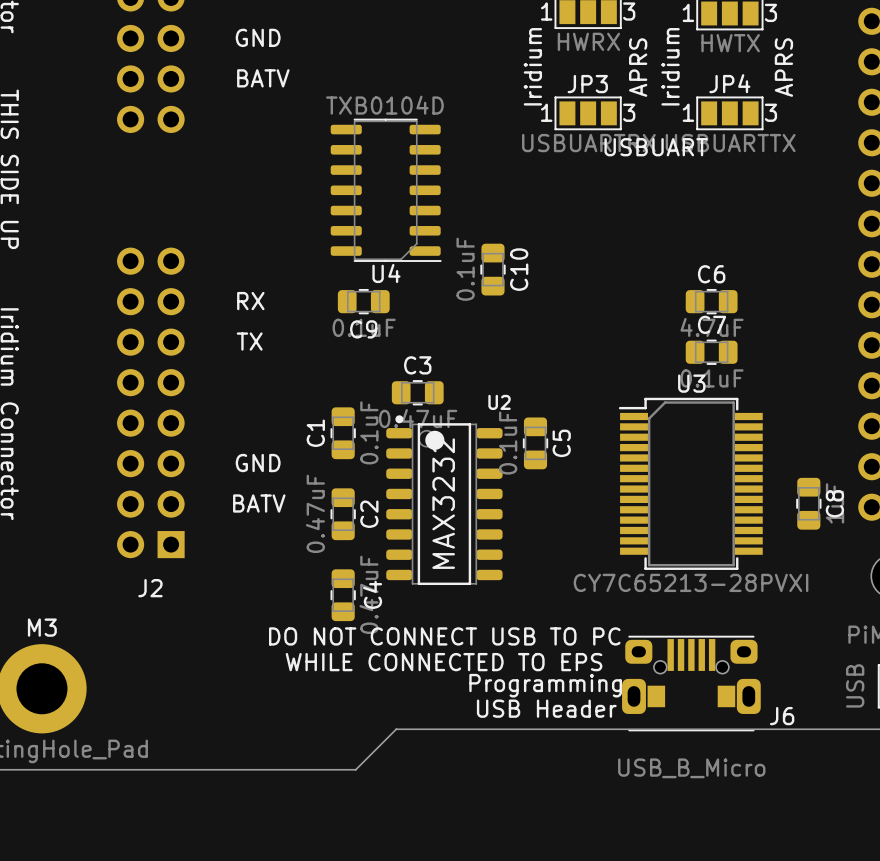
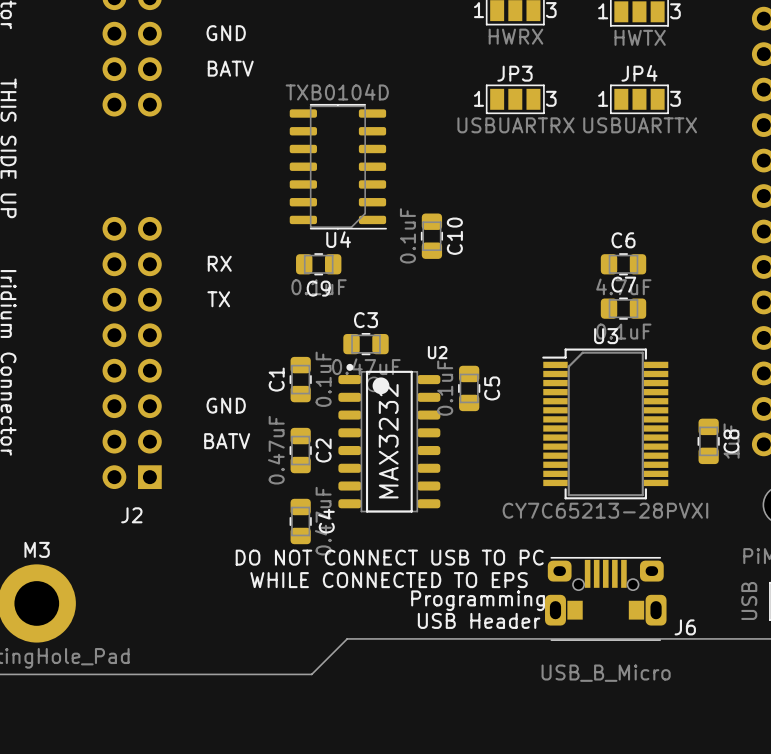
text: Iridium (532, 66) -> none
text: Iridium (670, 66) -> none
text: APRS (638, 67) -> none
text: APRS (783, 67) -> none
text: USBUART (656, 147) -> none

